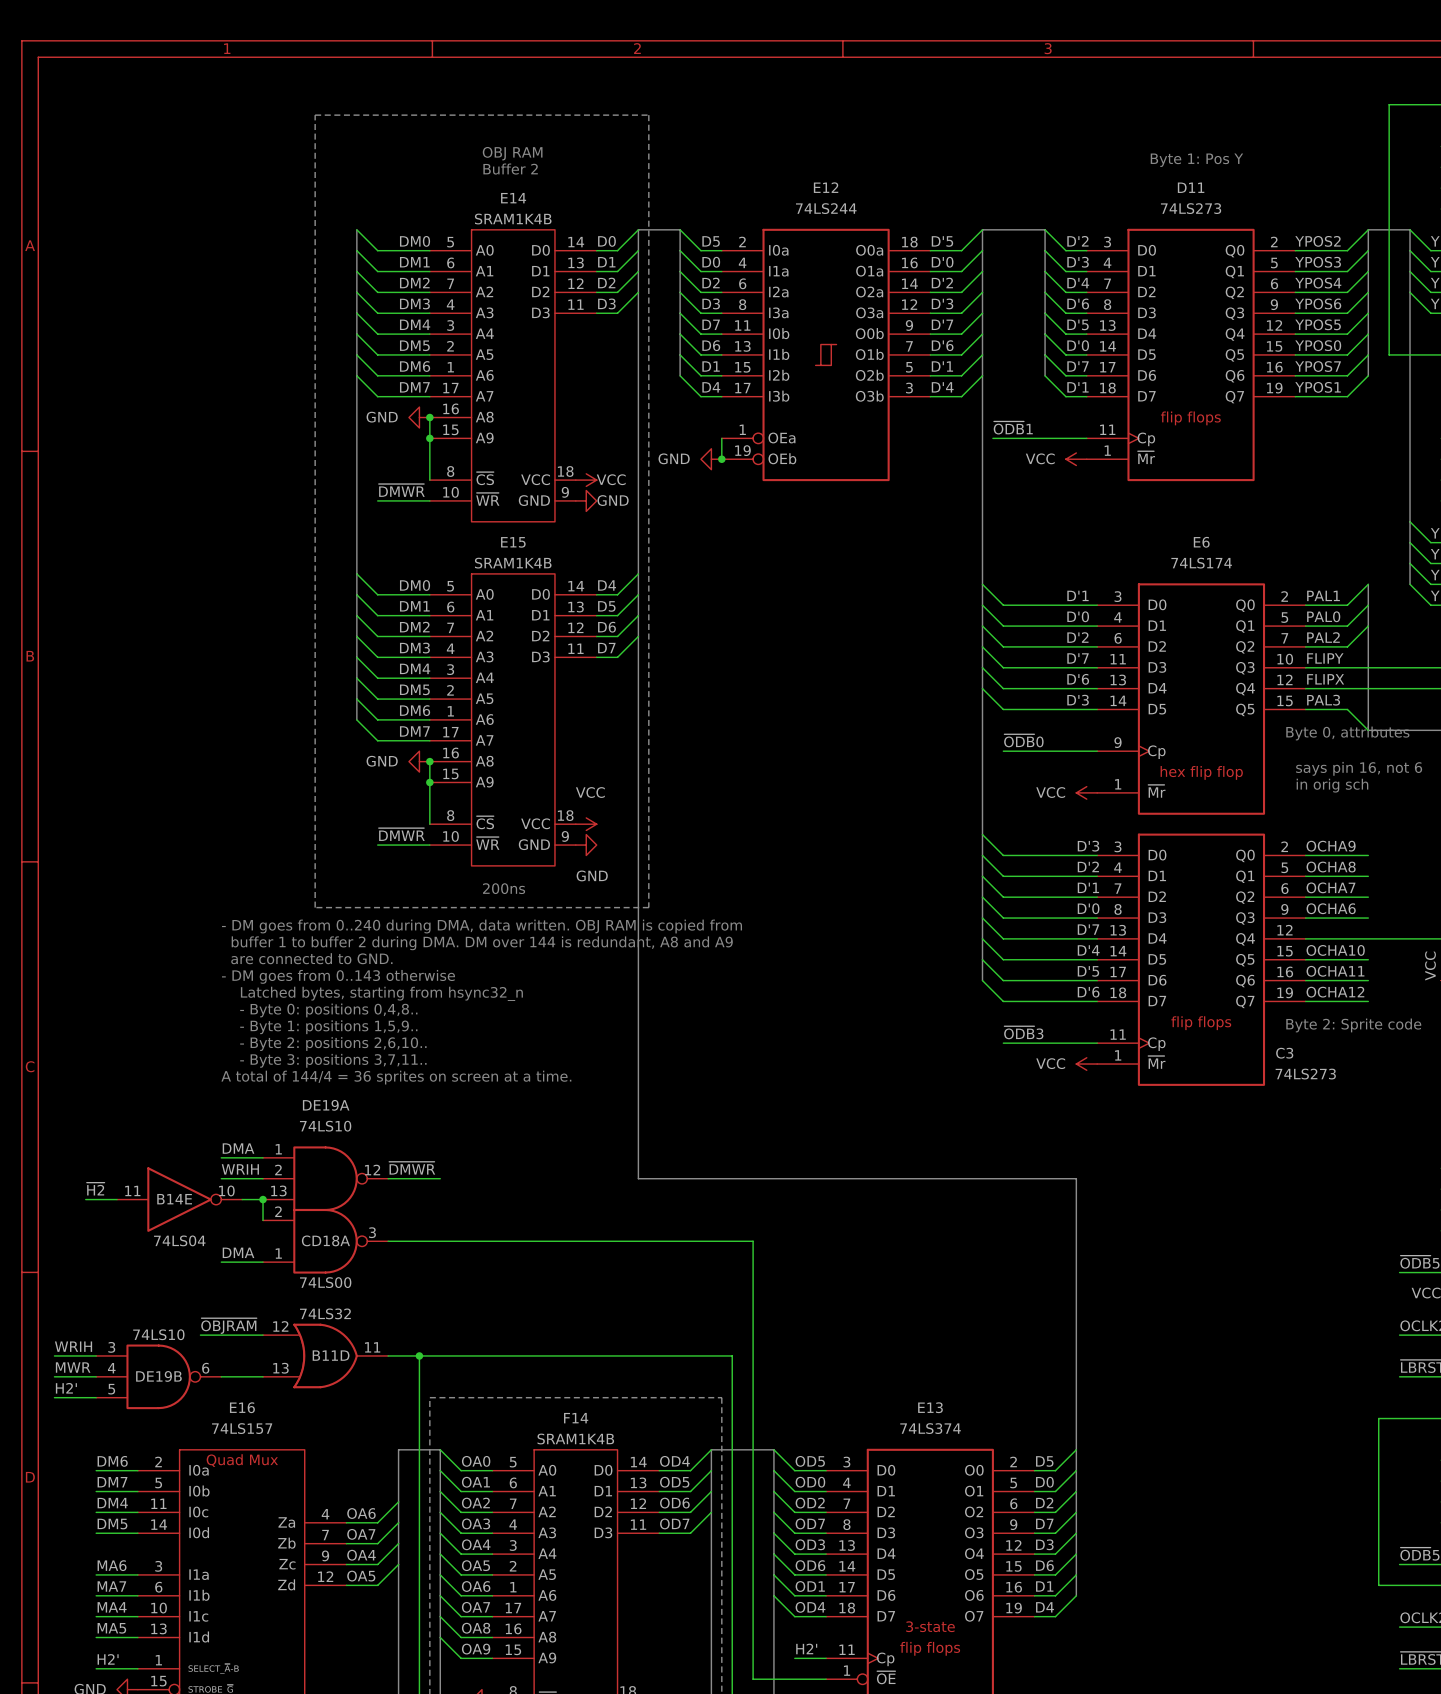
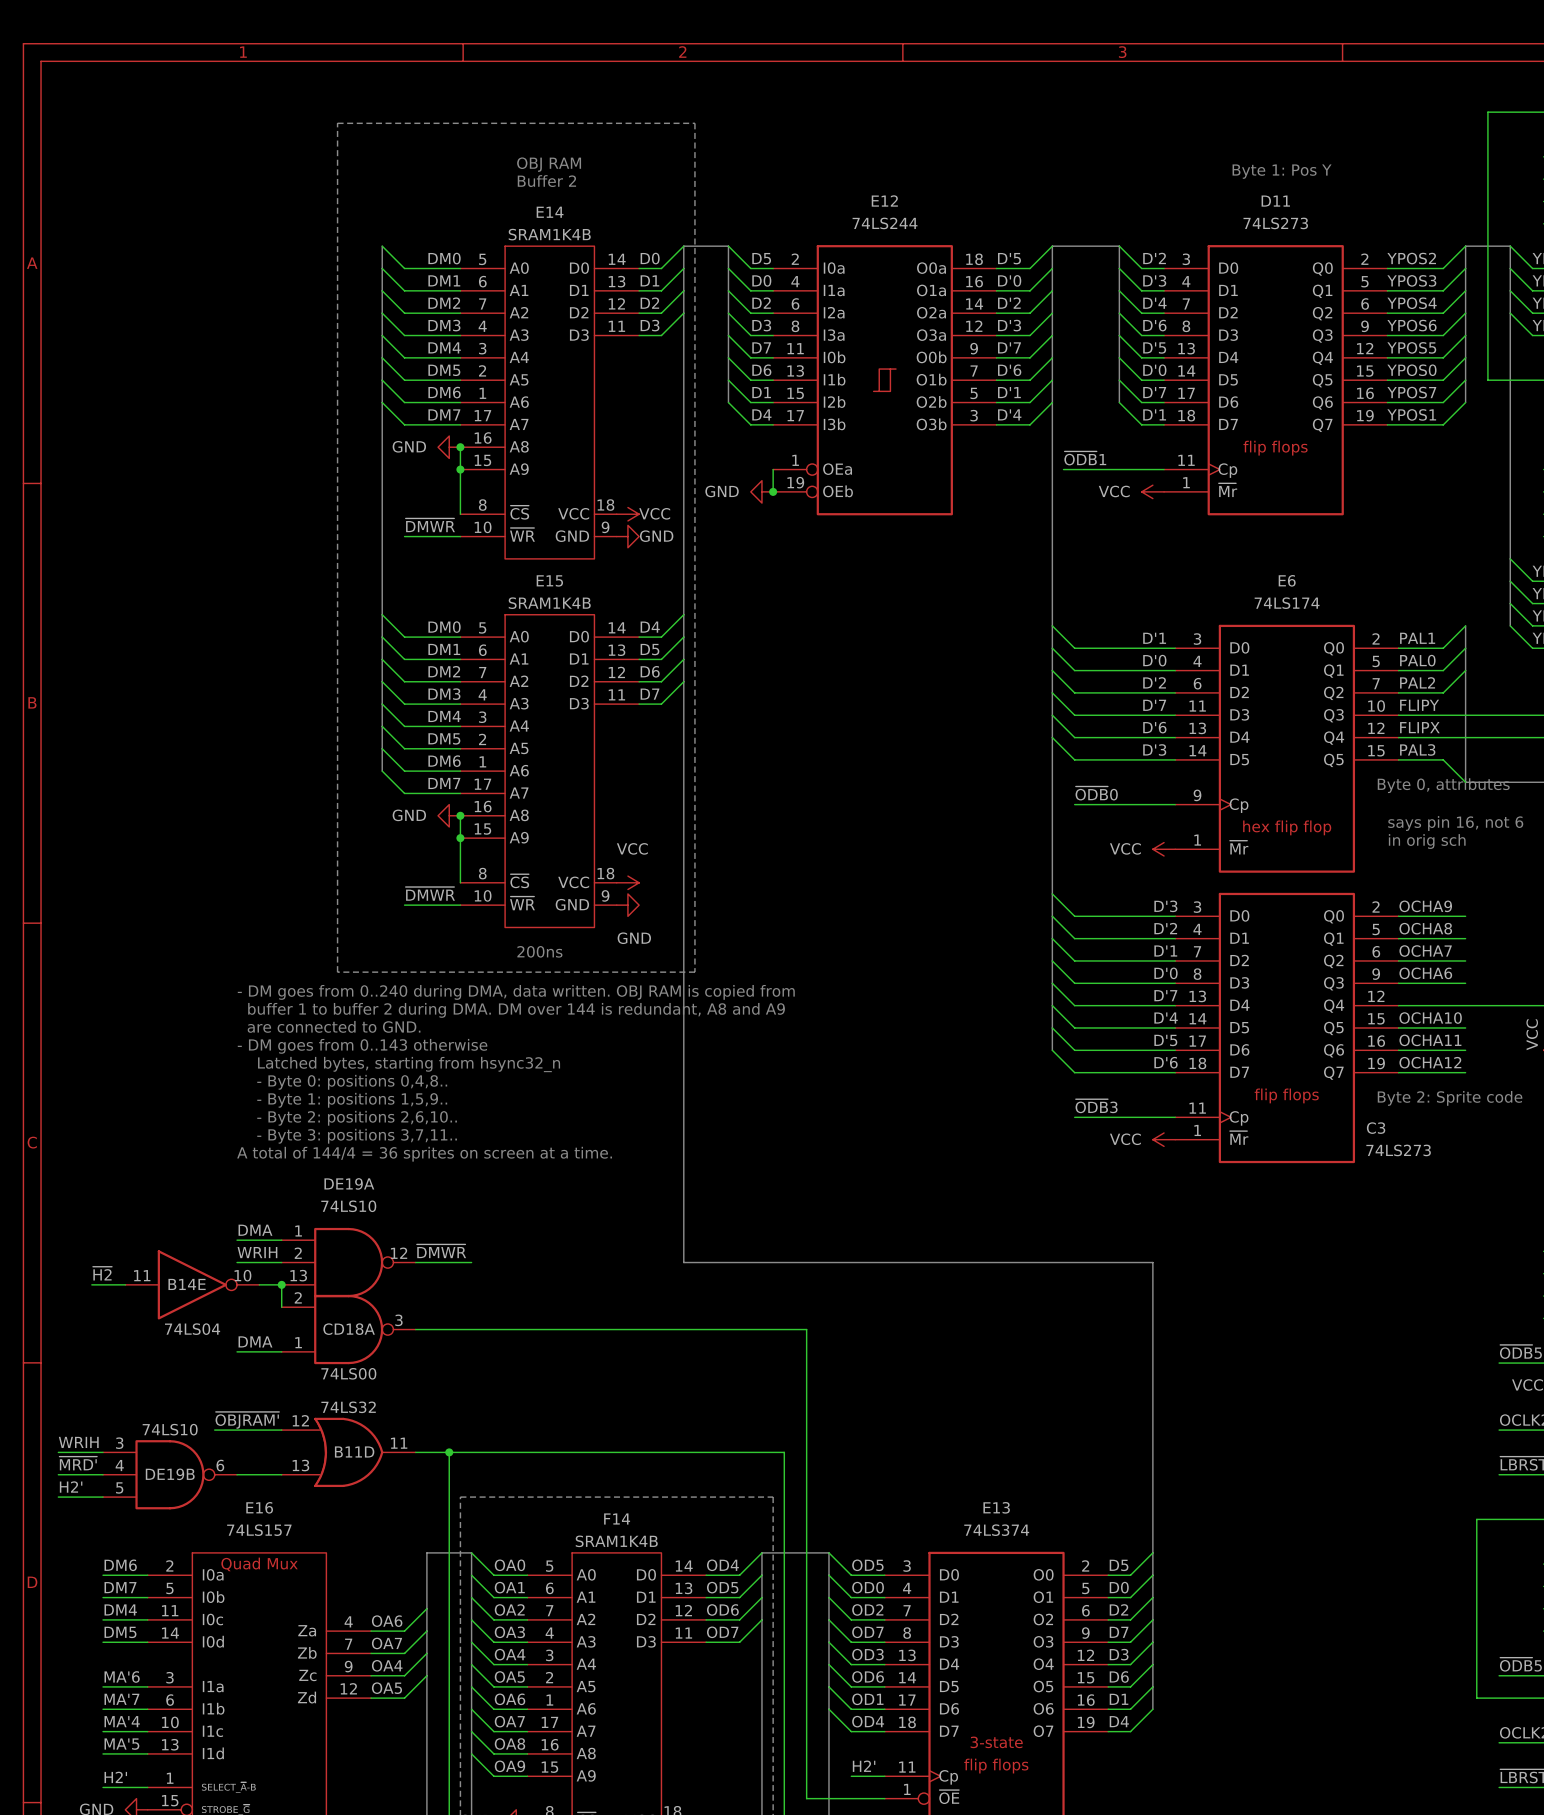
label: ~{OBJRAM} (229, 1326) -> ~{OBJRAM'} (247, 1420)
label: MWR (73, 1367) -> ~{MRD'} (78, 1463)
label: MA6 (112, 1565) -> MA'6 (122, 1676)
label: MA7 (111, 1586) -> MA'7 (121, 1699)
label: MA4 (112, 1607) -> MA'4 (122, 1721)
label: MA5 (111, 1628) -> MA'5 (121, 1744)

